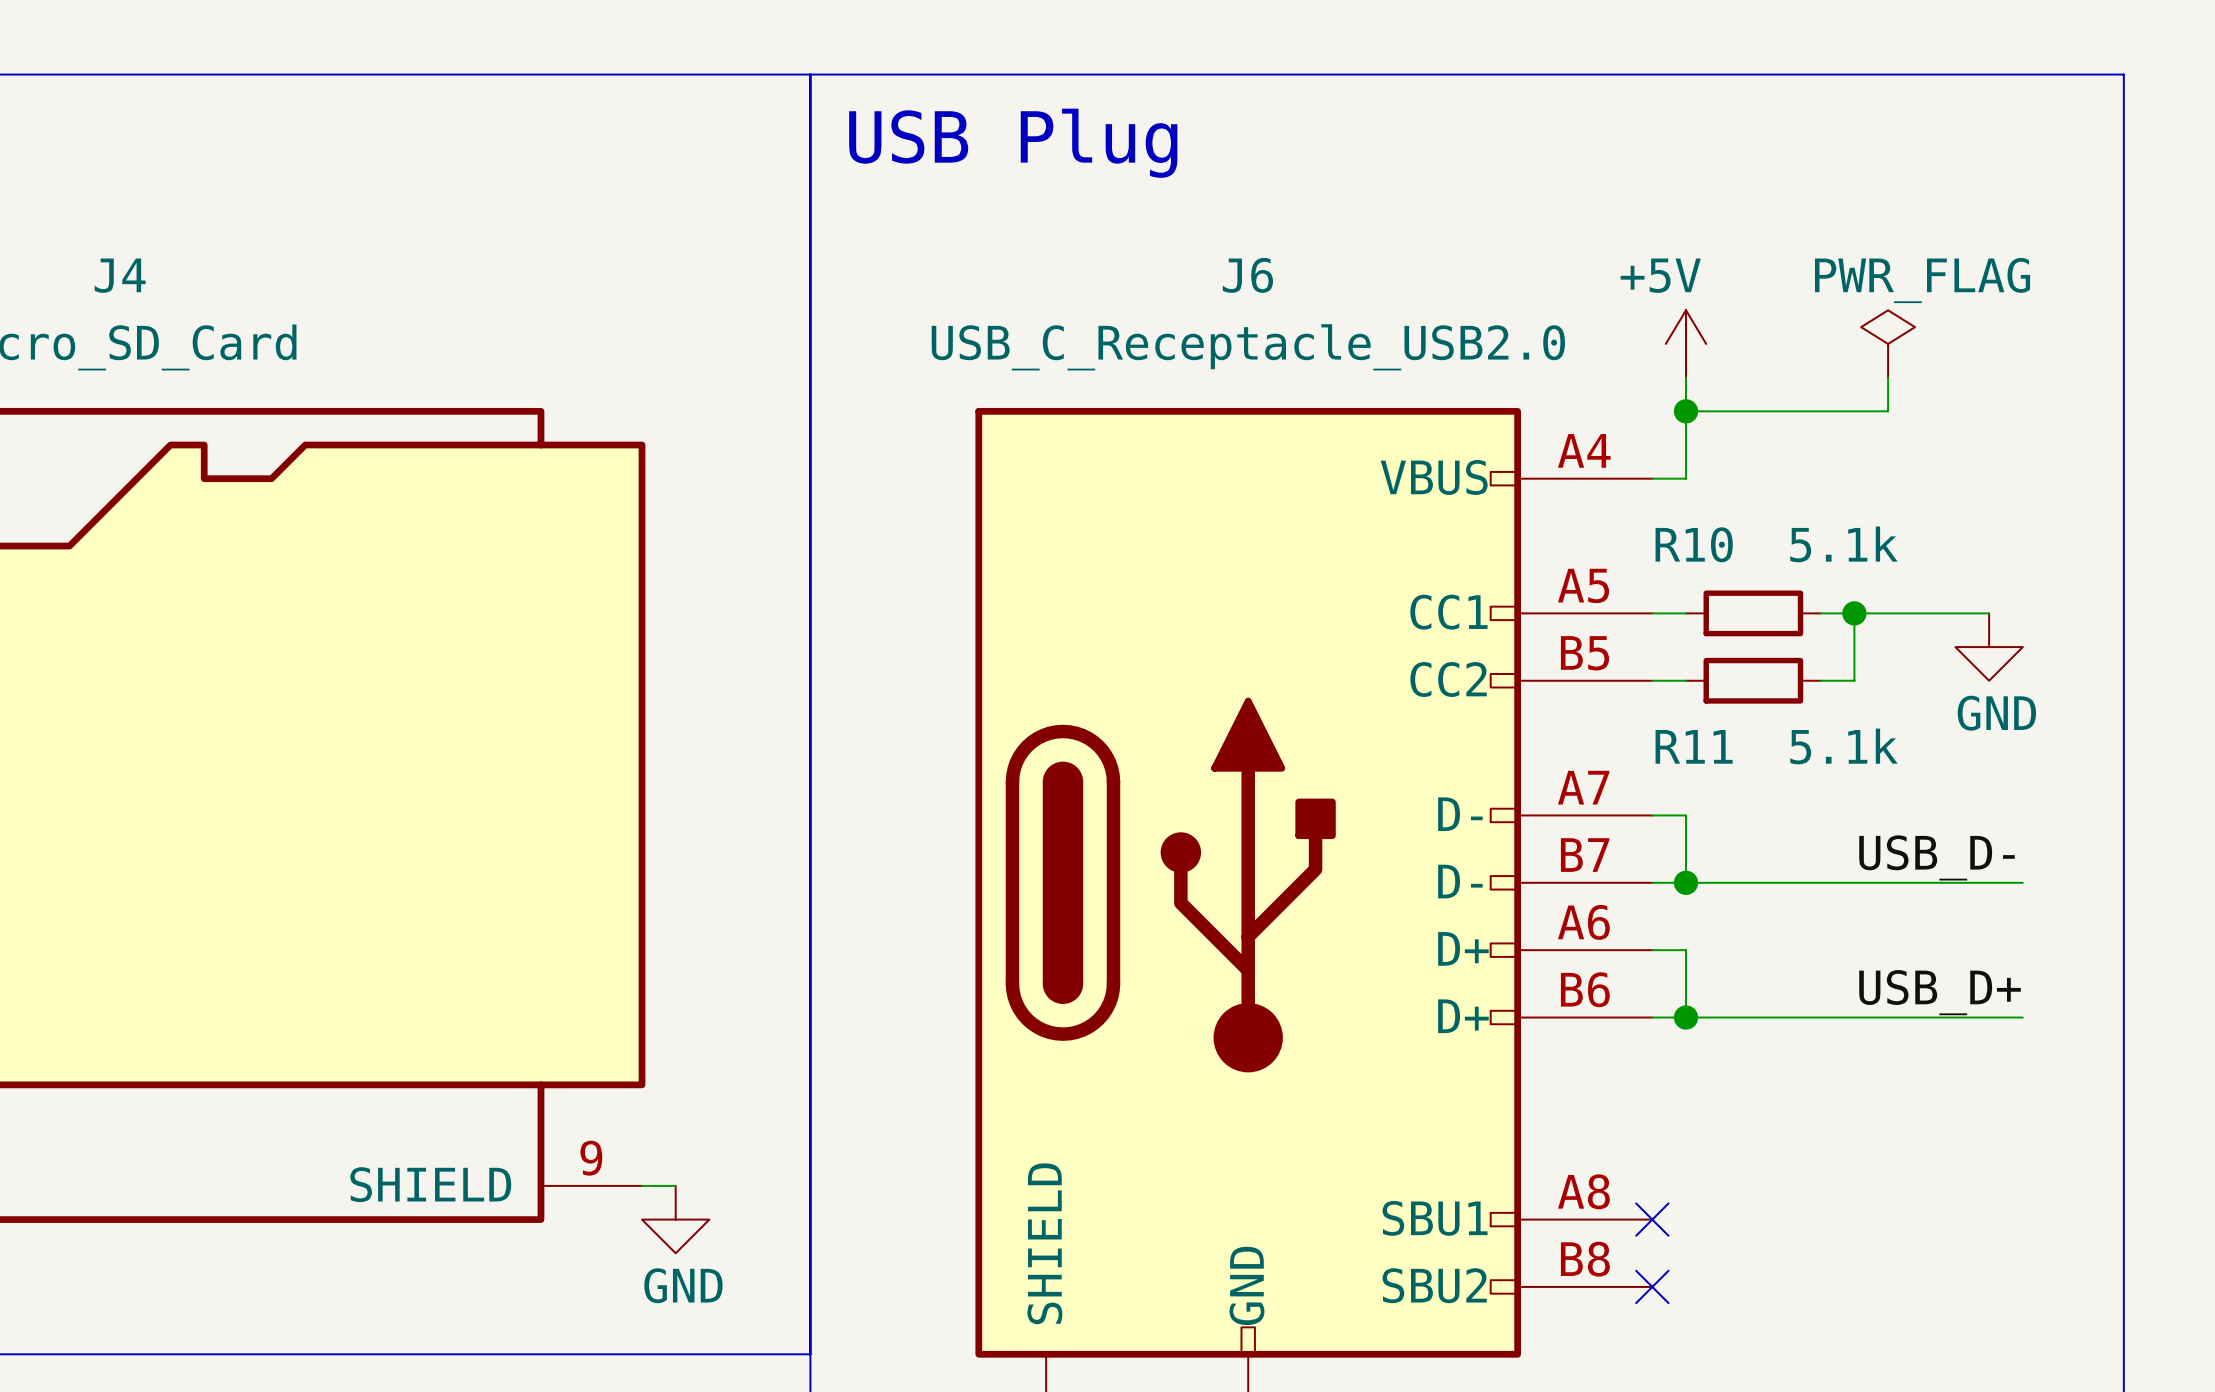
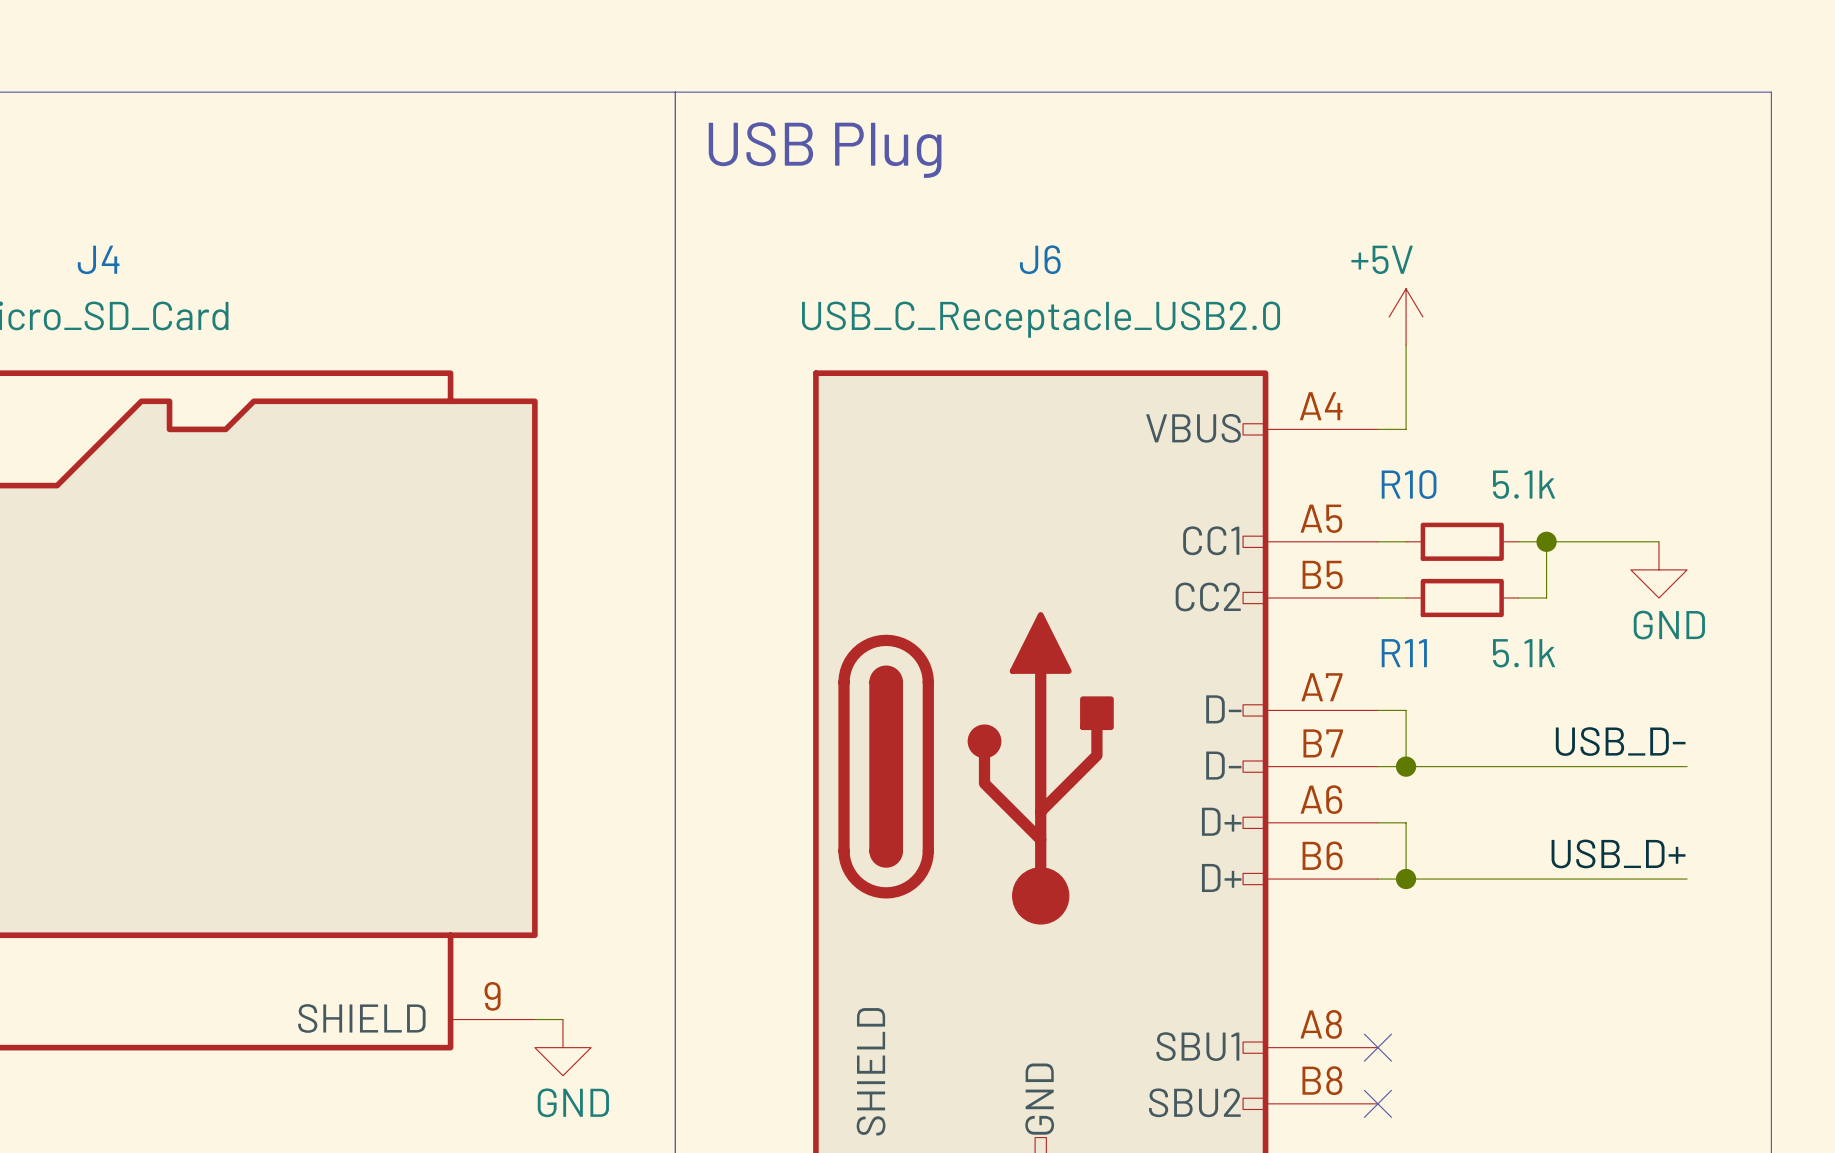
power symbol: PWR_FLAG (1888, 343) -> none
wire: (1888, 377) (1888, 411) (1686, 411) -> none
junction: (1686, 411) -> none

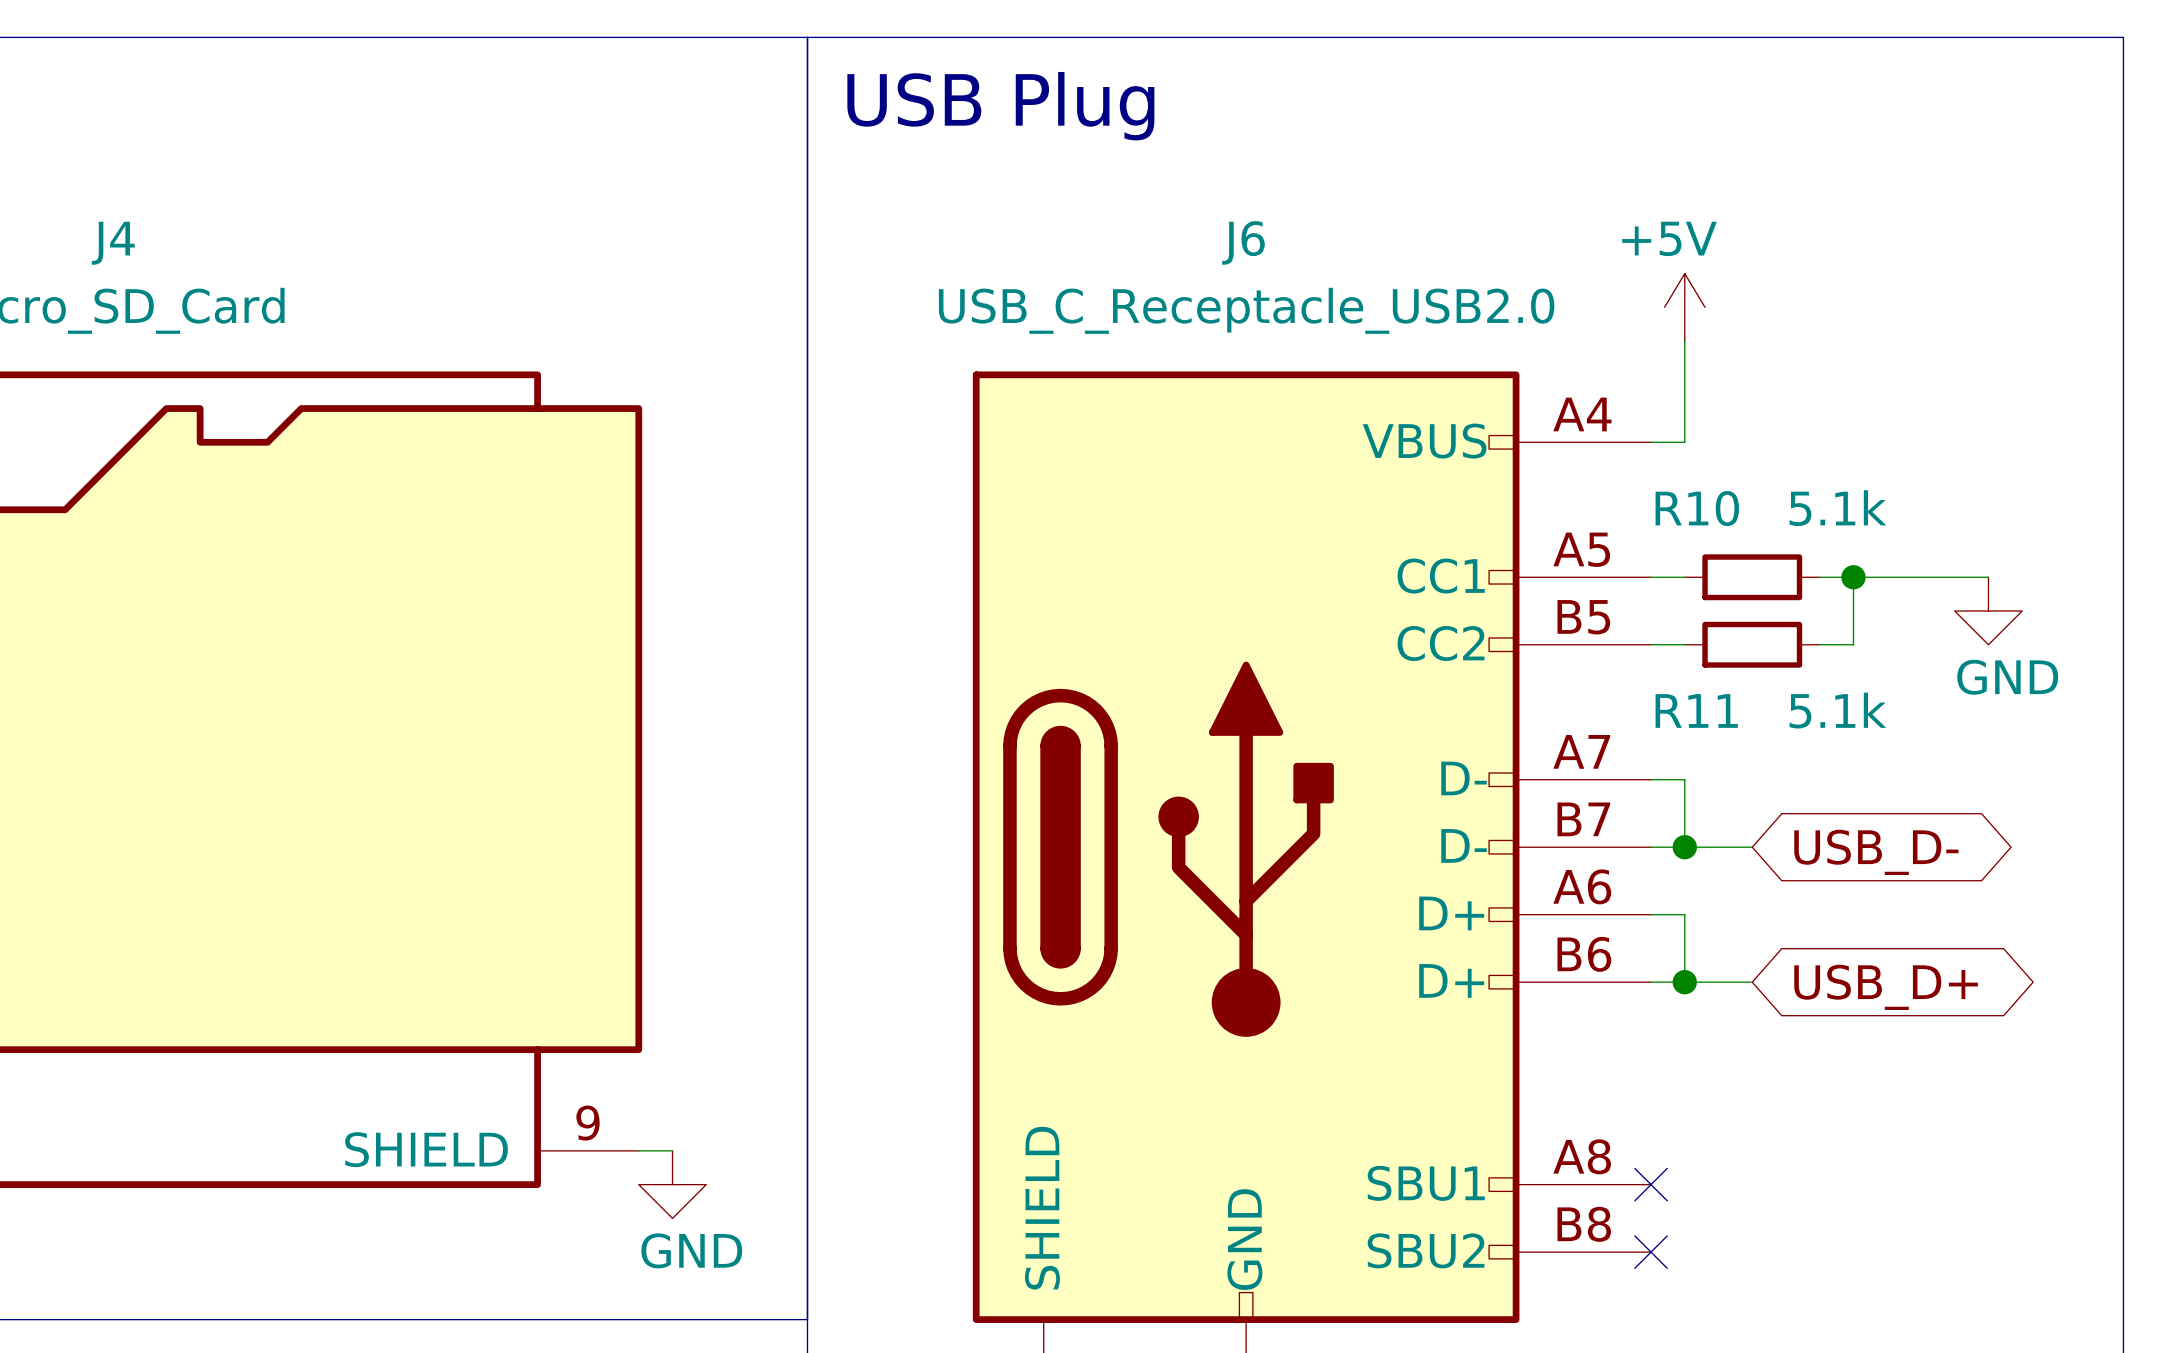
label: USB_D- (1620, 741) -> none
wire: (1462, 766) (1687, 766) -> none
global label: none -> USB_D- (1876, 852)
label: USB_D+ (1618, 853) -> none
wire: (1462, 879) (1687, 879) -> none
global label: none -> USB_D+ (1886, 987)

